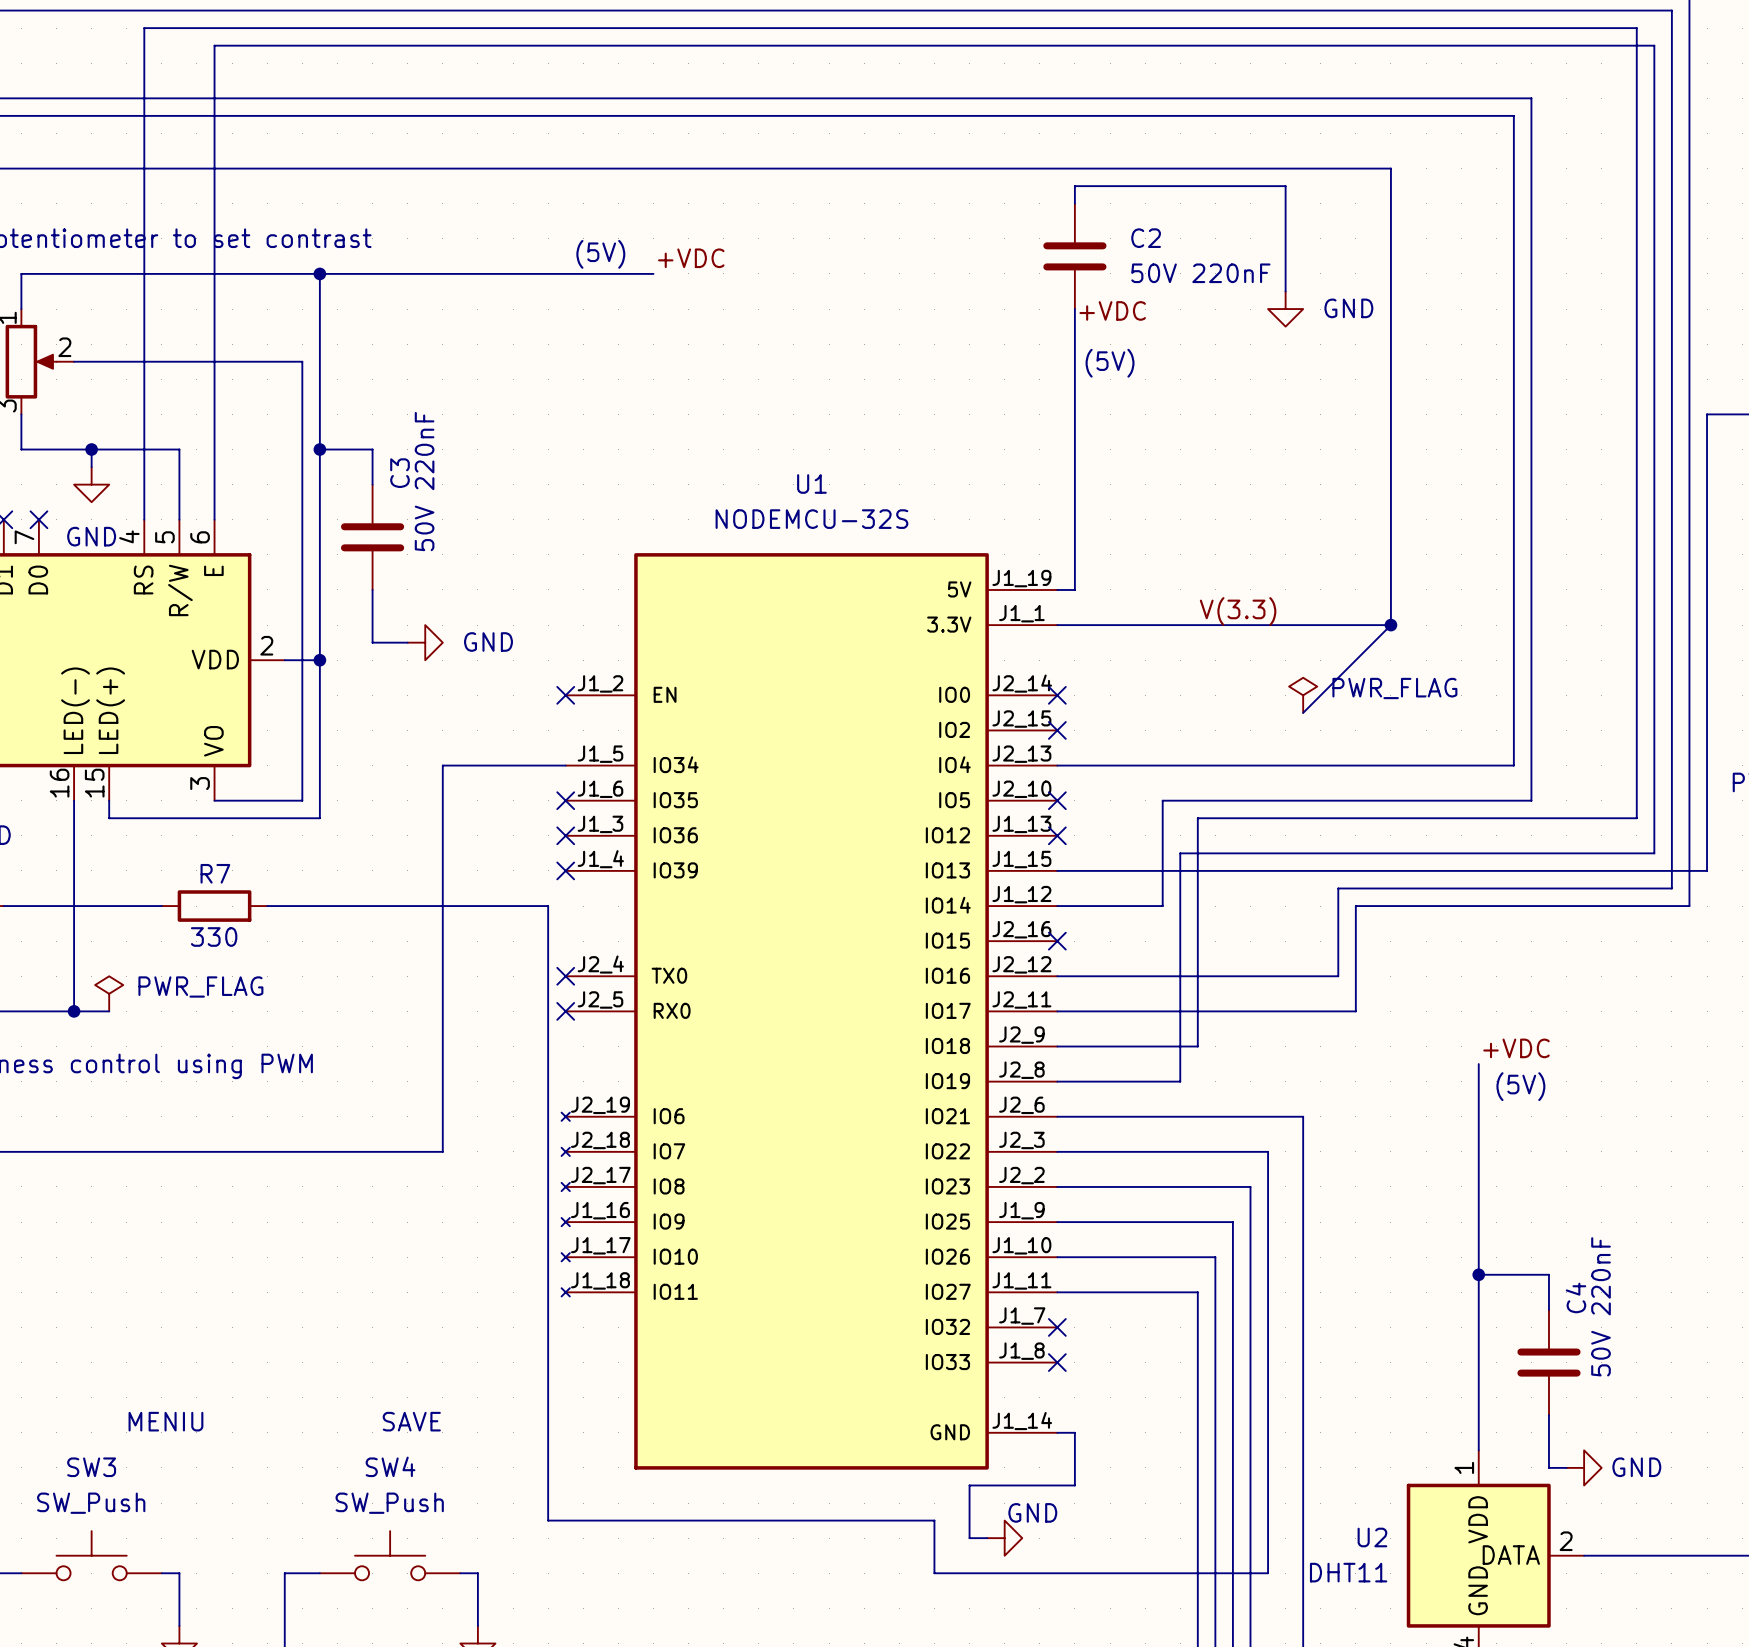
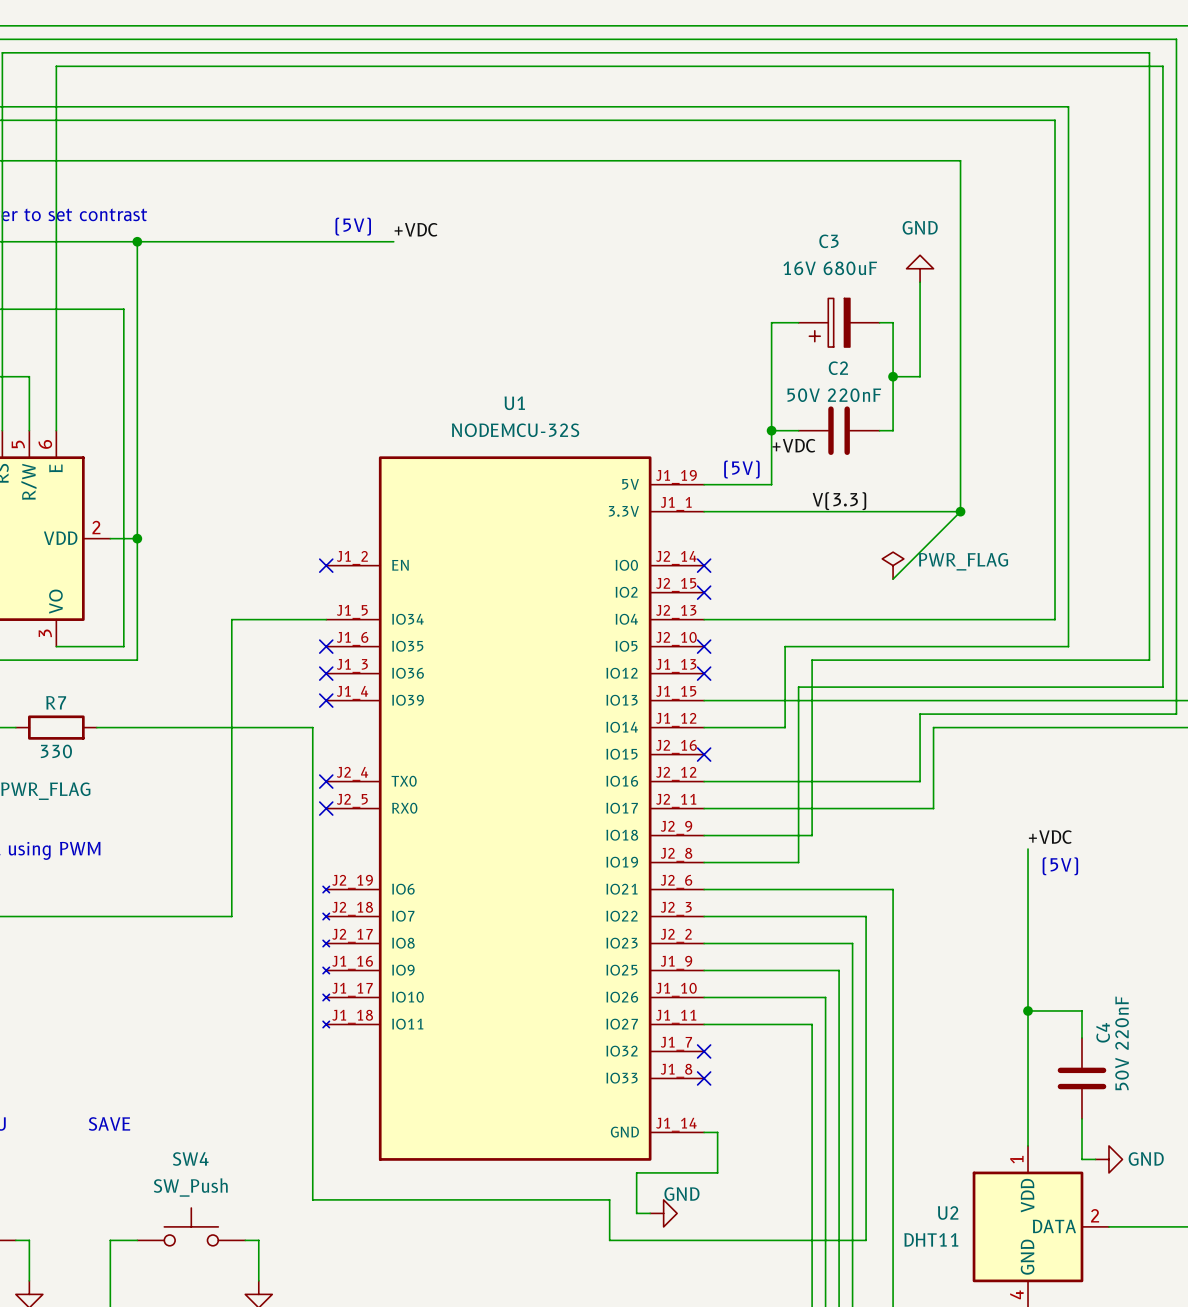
wire: (1074, 203) (1074, 186) (1285, 186) (1285, 291) -> none
C2 name position: C2 (1146, 238) -> C2 (838, 368)
C2 rotation: 0° (1074, 256) -> 90° clockwise (839, 430)
C2 position: (1074, 256) -> (839, 430)
C2 value position: 50V 220nF (1200, 273) -> 50V 220nF (834, 395)
power symbol text position: GND (1348, 308) -> GND (920, 227)
wire: (1074, 309) (1074, 589) -> (798, 322) (771, 322) (771, 484) (717, 484)
power symbol rotation: 0° (1285, 309) -> 180° (920, 268)
power symbol position: GND (1285, 309) -> GND (920, 268)
label position: +VDC (1112, 310) -> +VDC (793, 445)
wire: none -> (920, 282) (920, 376) (893, 376)
text position: (5V) (1110, 363) -> (5V) (741, 469)
wire: none -> (879, 322) (893, 322) (893, 430) (879, 430)
wire: (319, 449) (372, 449) (372, 484) -> none
junction: (319, 449) -> none
junction: none -> (893, 376)
C3 name position: C3 (400, 473) -> C3 (828, 241)
C3 value: 50V 220nF (424, 481) -> 16V 680uF (830, 268)
C3 symbol: [340, 484, 405, 590] -> [798, 298, 880, 348]
wire: none -> (771, 430) (798, 430)
junction: none -> (771, 430)
wire: (372, 589) (372, 642) (407, 642) -> none
power symbol: GND (425, 642) -> none

